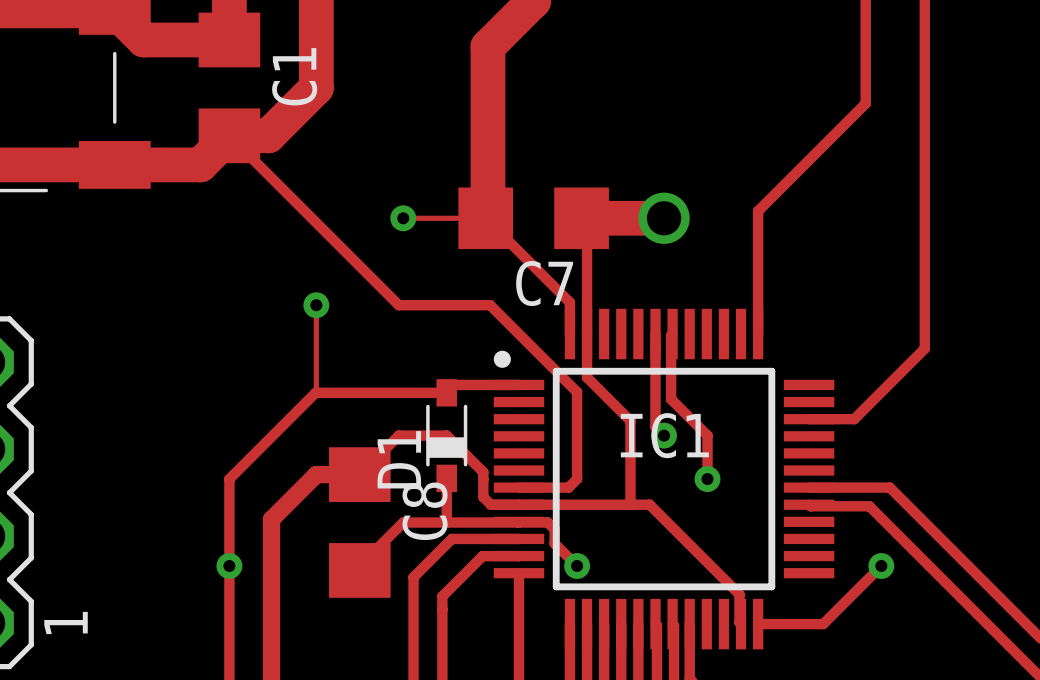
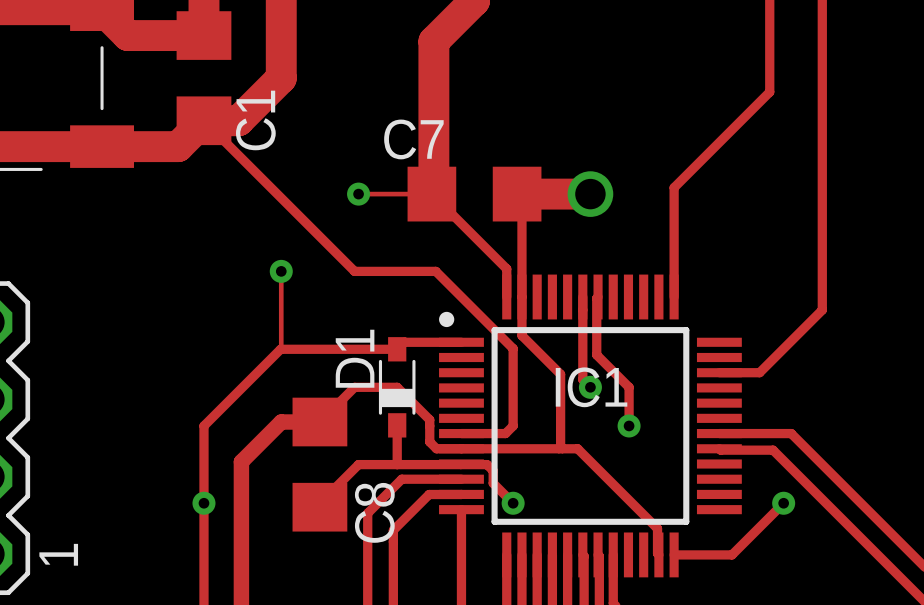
C1 name position: C1 (294, 76) -> C1 (255, 120)
C7 name position: C7 (544, 283) -> C7 (413, 139)
D1 name position: D1 (399, 459) -> D1 (355, 358)
C8 name position: C8 (425, 511) -> C8 (374, 512)

